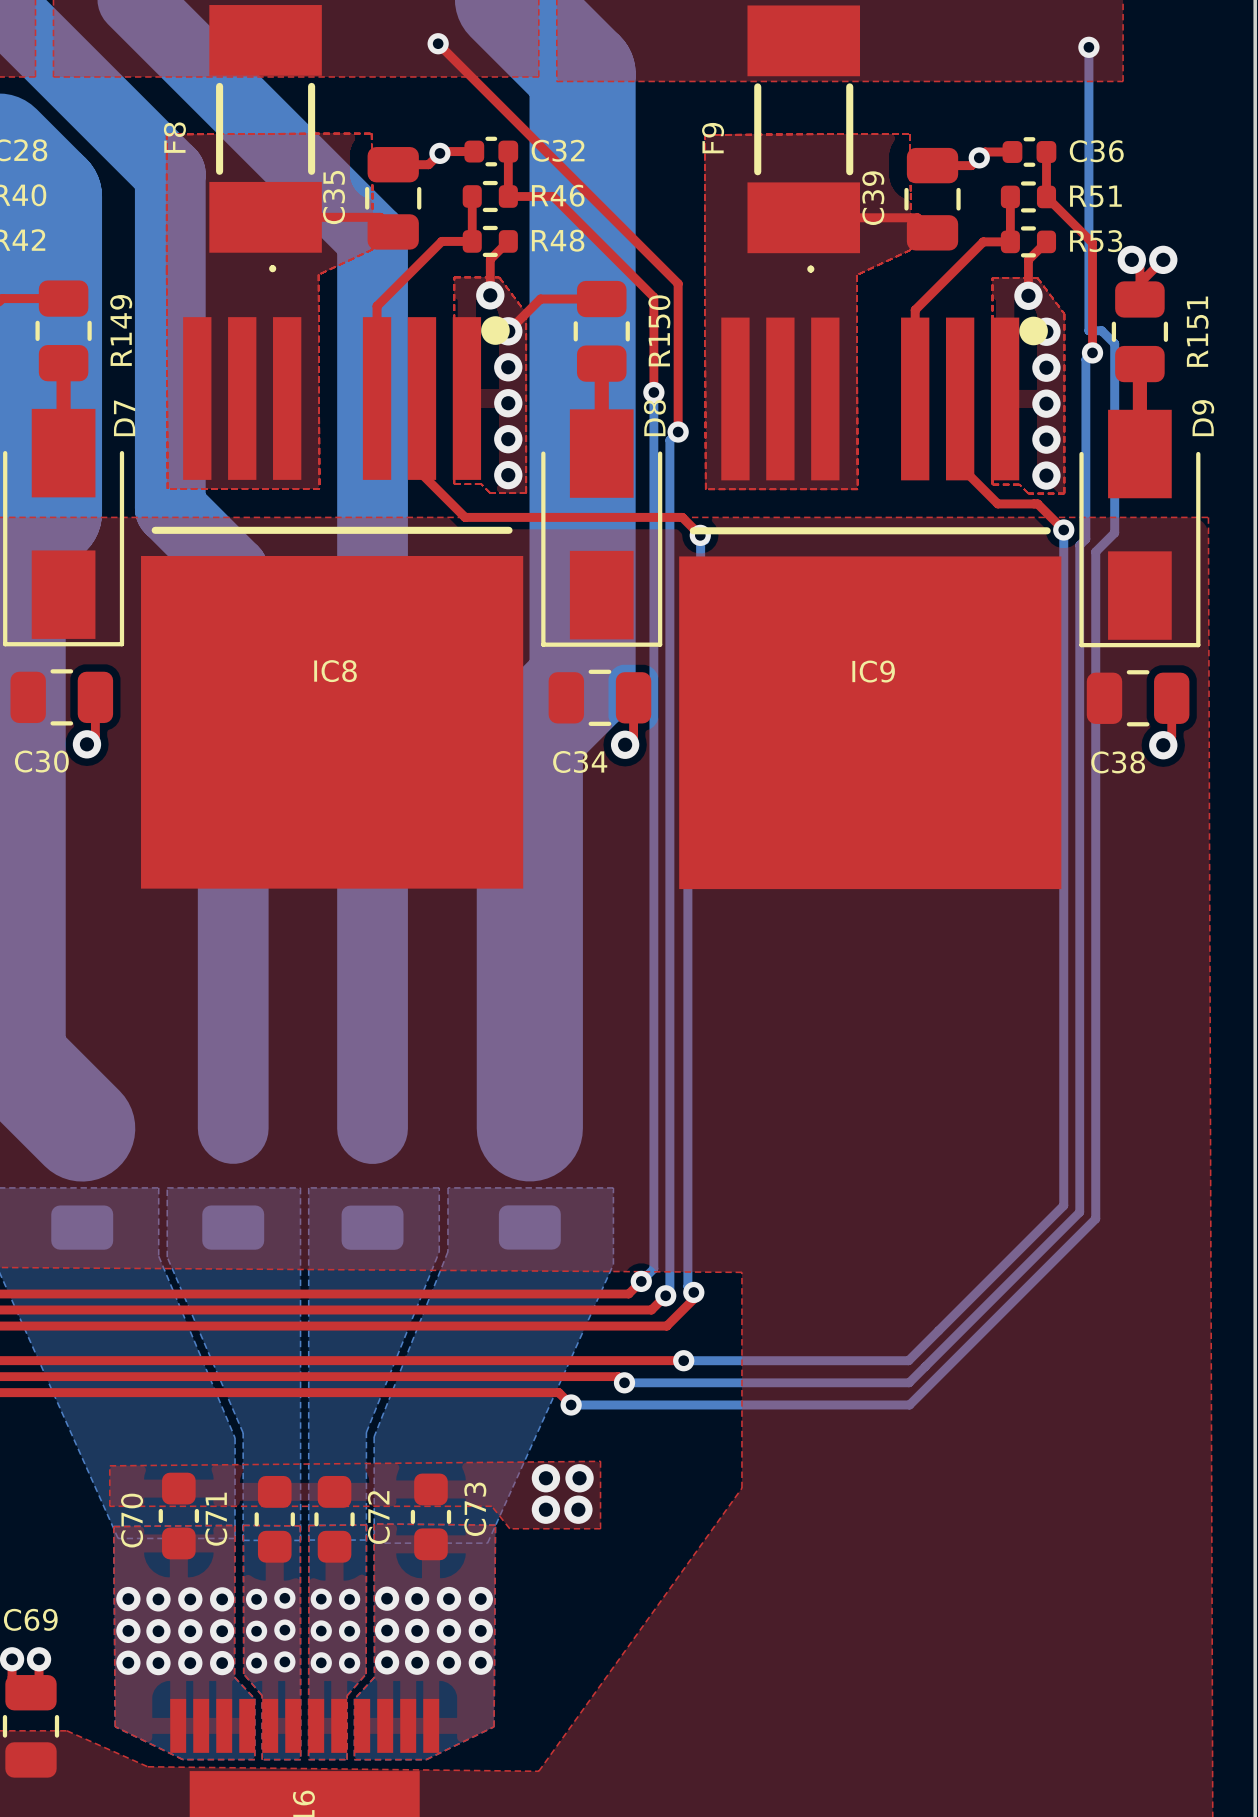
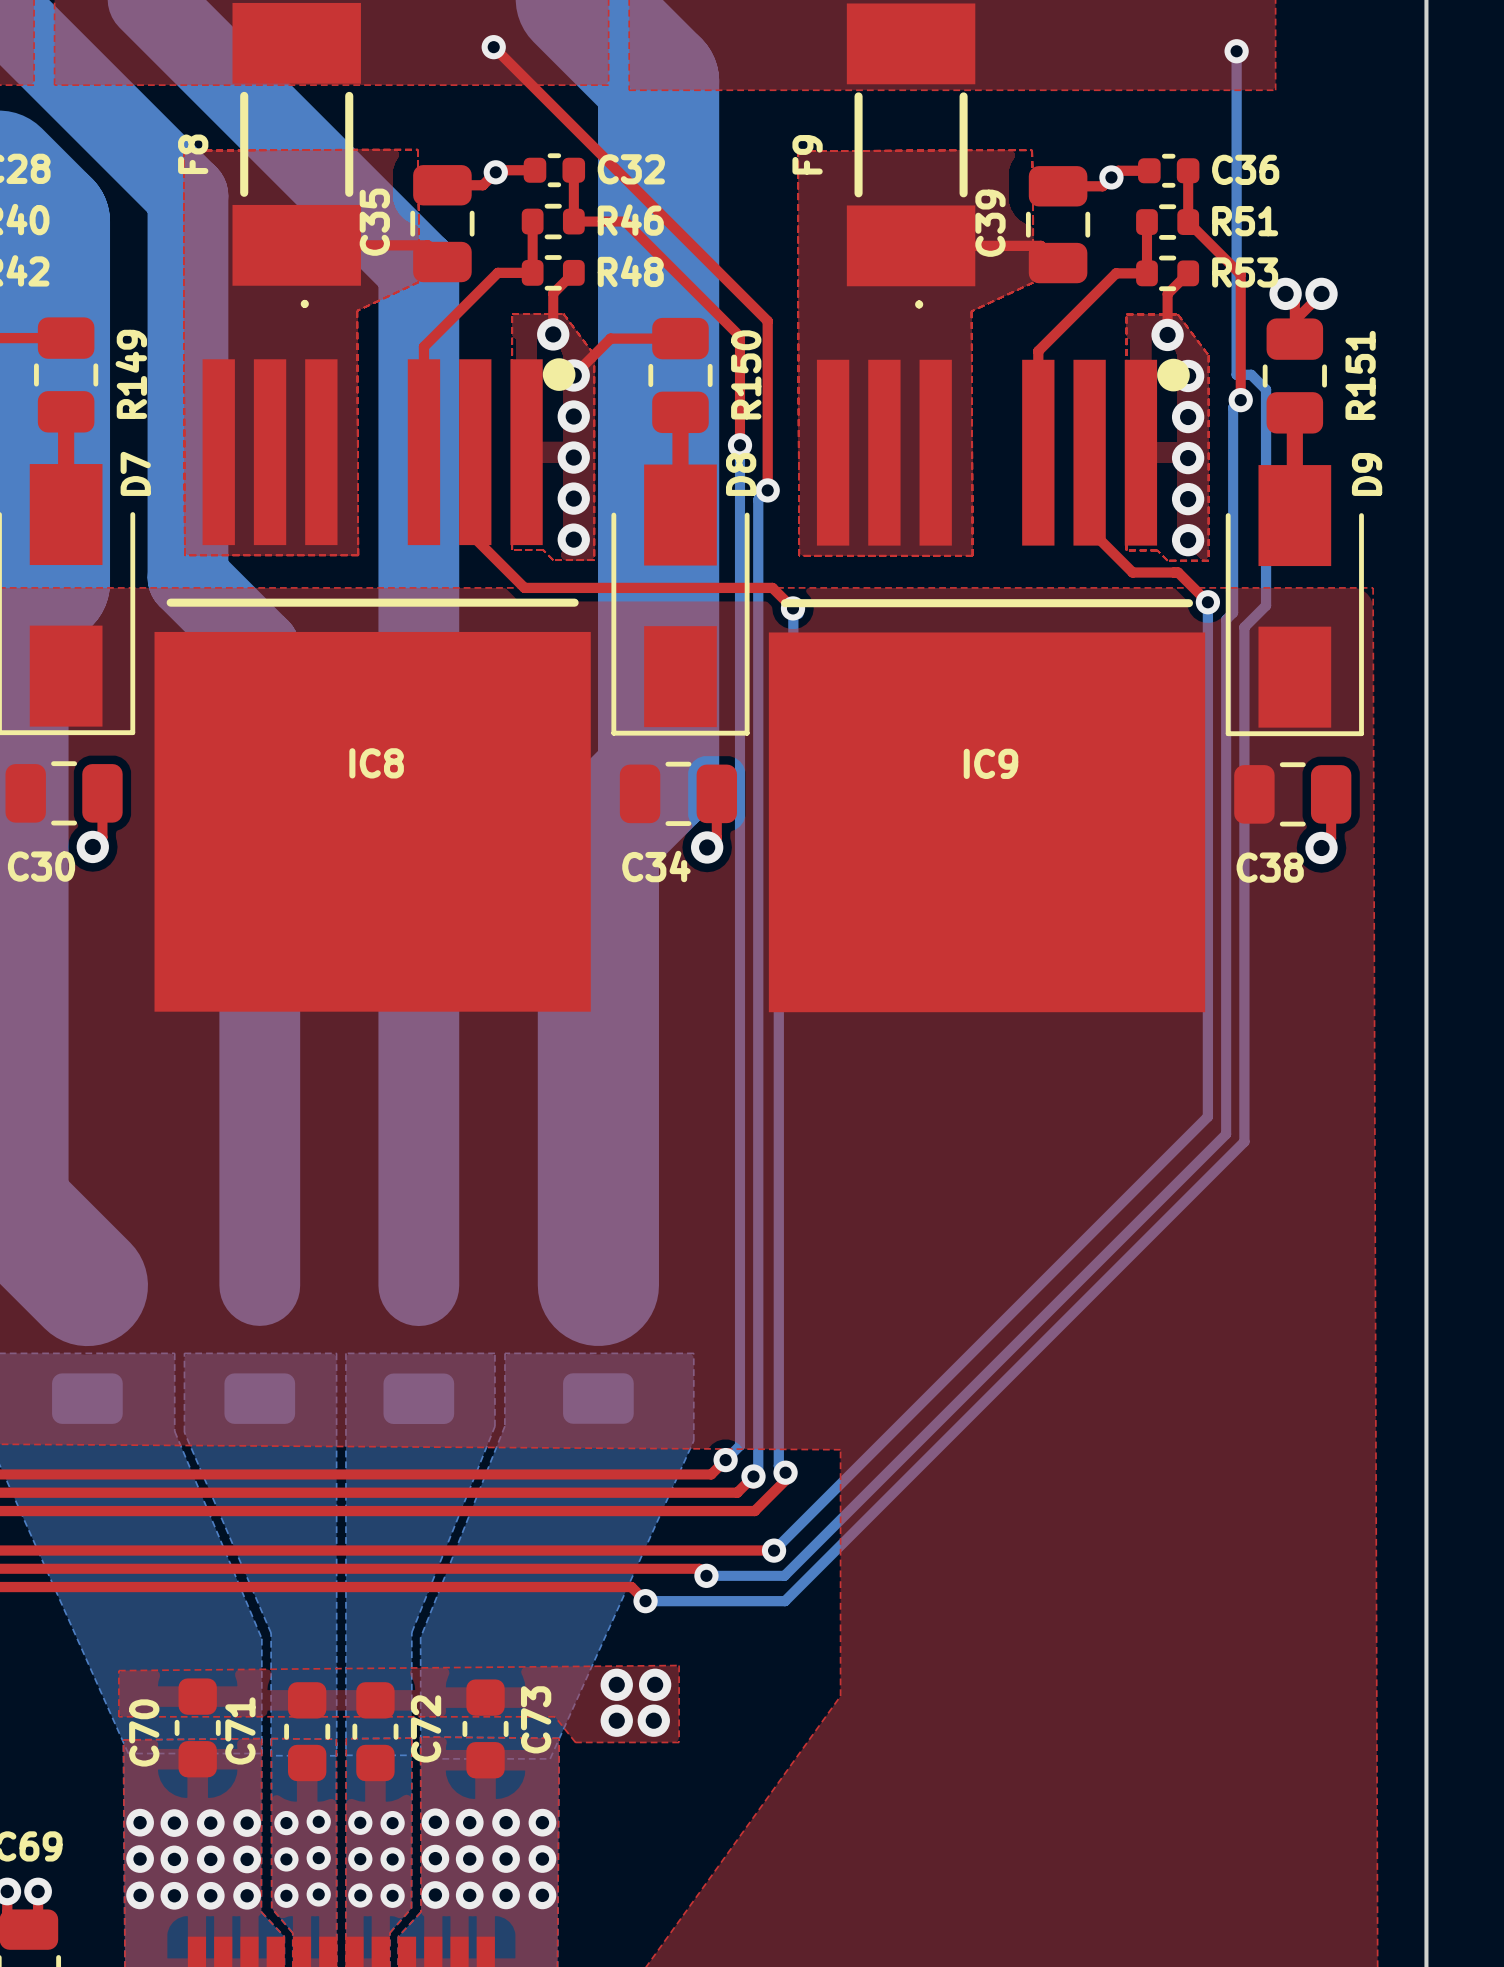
bottom track: (1063, 980) (1063, 1205) (908, 1360) (683, 1360) -> (1207, 1116) (774, 1550)
bottom track: (1079, 995) (1079, 1212) (909, 1382) (692, 1382) -> (1226, 1134) (784, 1575)
bottom track: (1095, 1002) (1095, 1218) (909, 1404) (693, 1404) -> (1244, 1141) (785, 1601)

